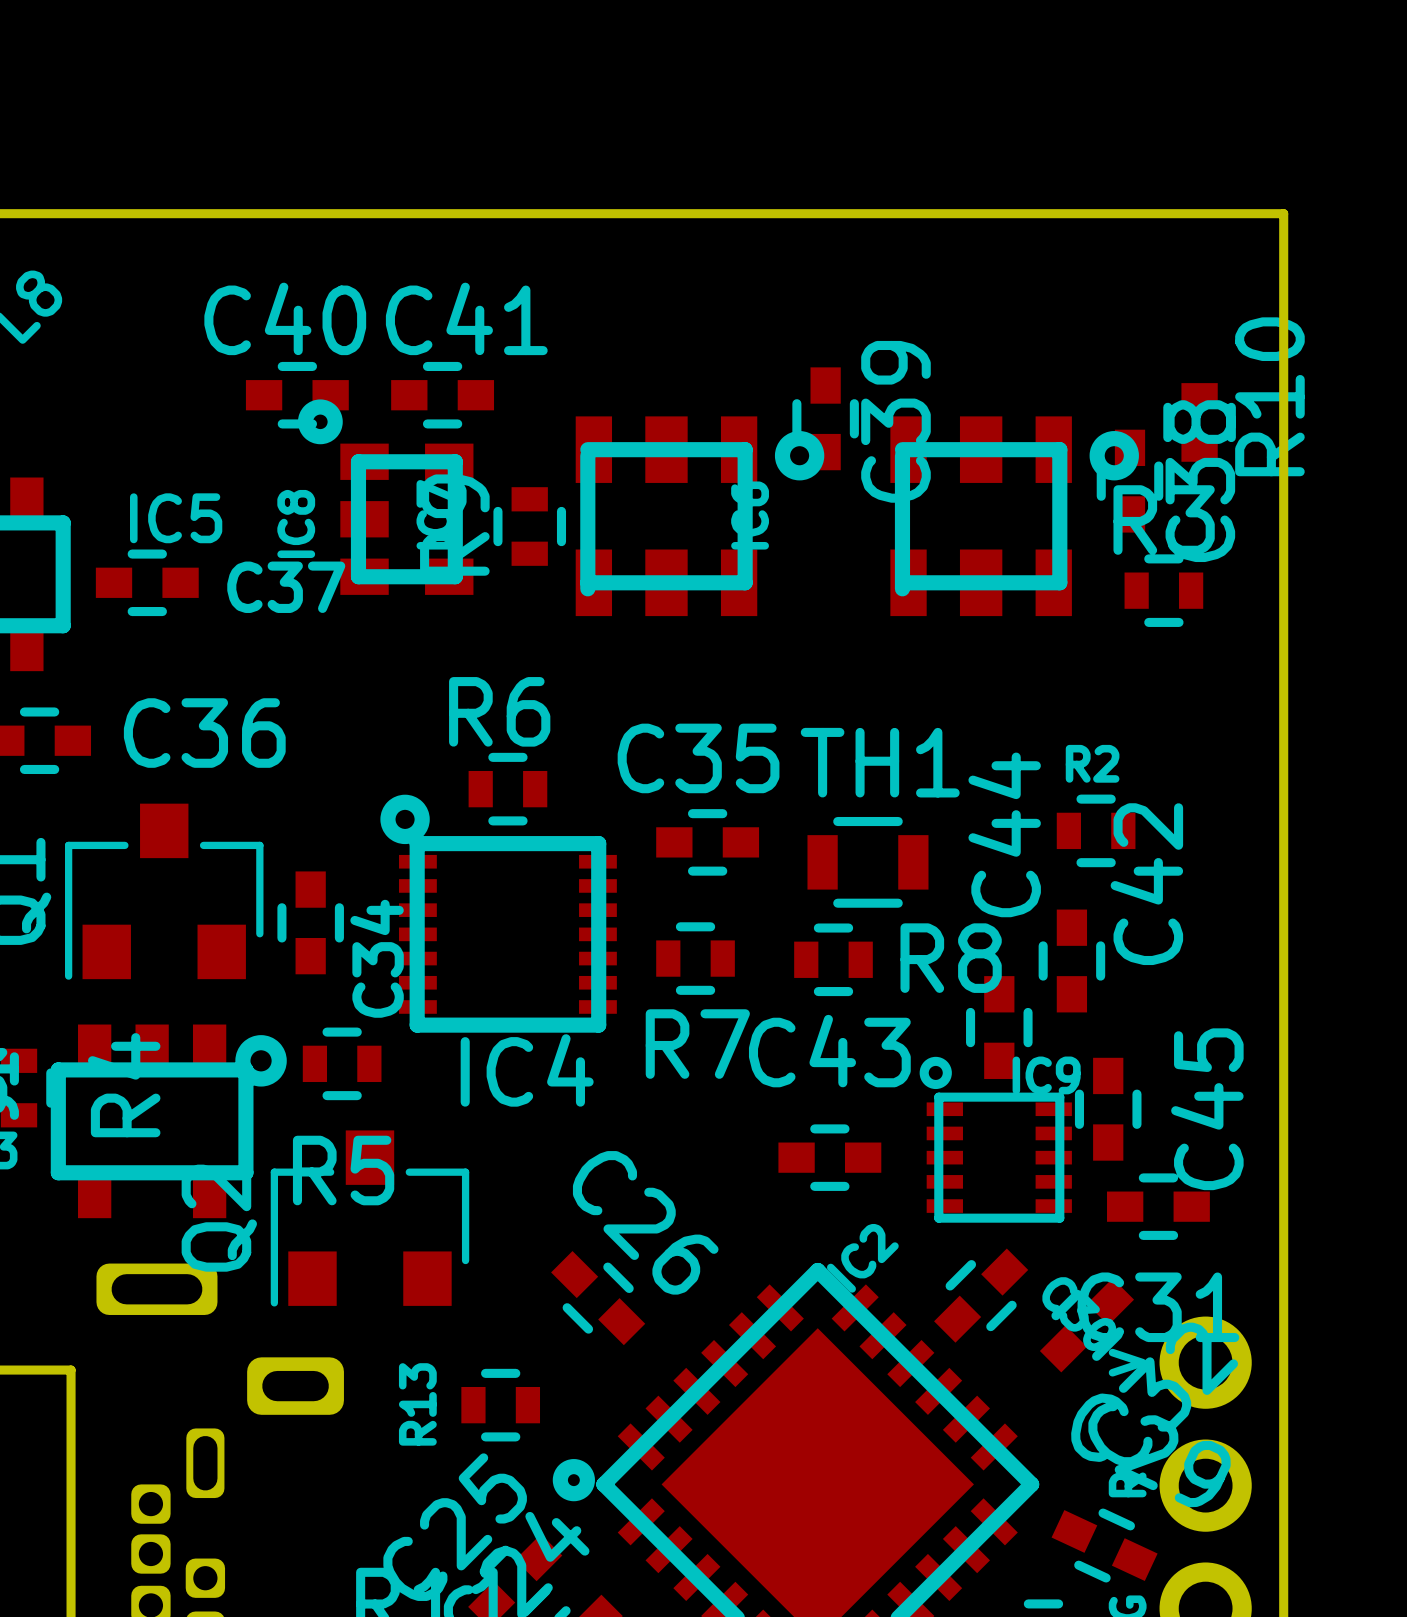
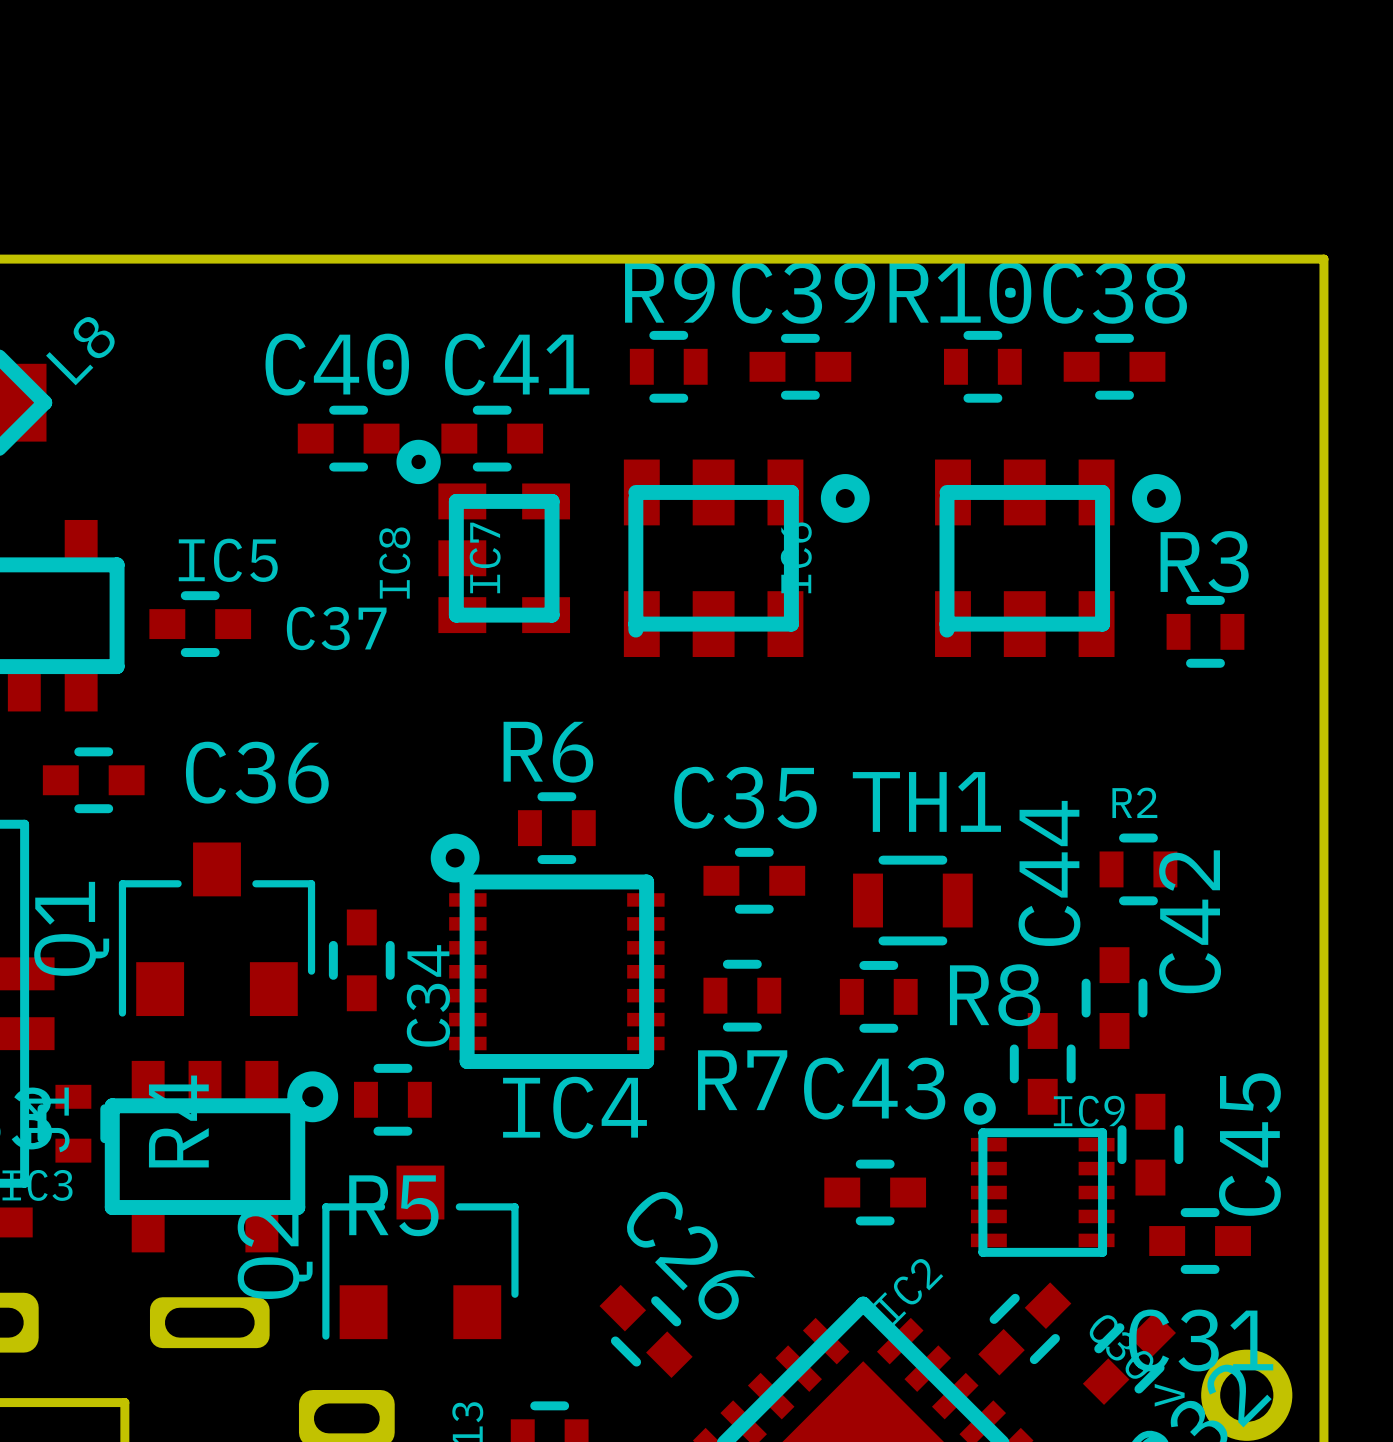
C39 rotation: 0° (825, 418) -> 90° clockwise (800, 366)
C39 position: (825, 418) -> (800, 366)
R10 rotation: 0° (1199, 422) -> 90° clockwise (982, 366)
R10 position: (1199, 422) -> (982, 366)
C38 rotation: 0° (1130, 481) -> 90° clockwise (1114, 366)
C38 position: (1130, 481) -> (1114, 366)
IC8 position: (385, 497) -> (483, 536)
R9 rotation: 0° (529, 526) -> 90° clockwise (668, 366)
R9 position: (529, 526) -> (668, 366)

